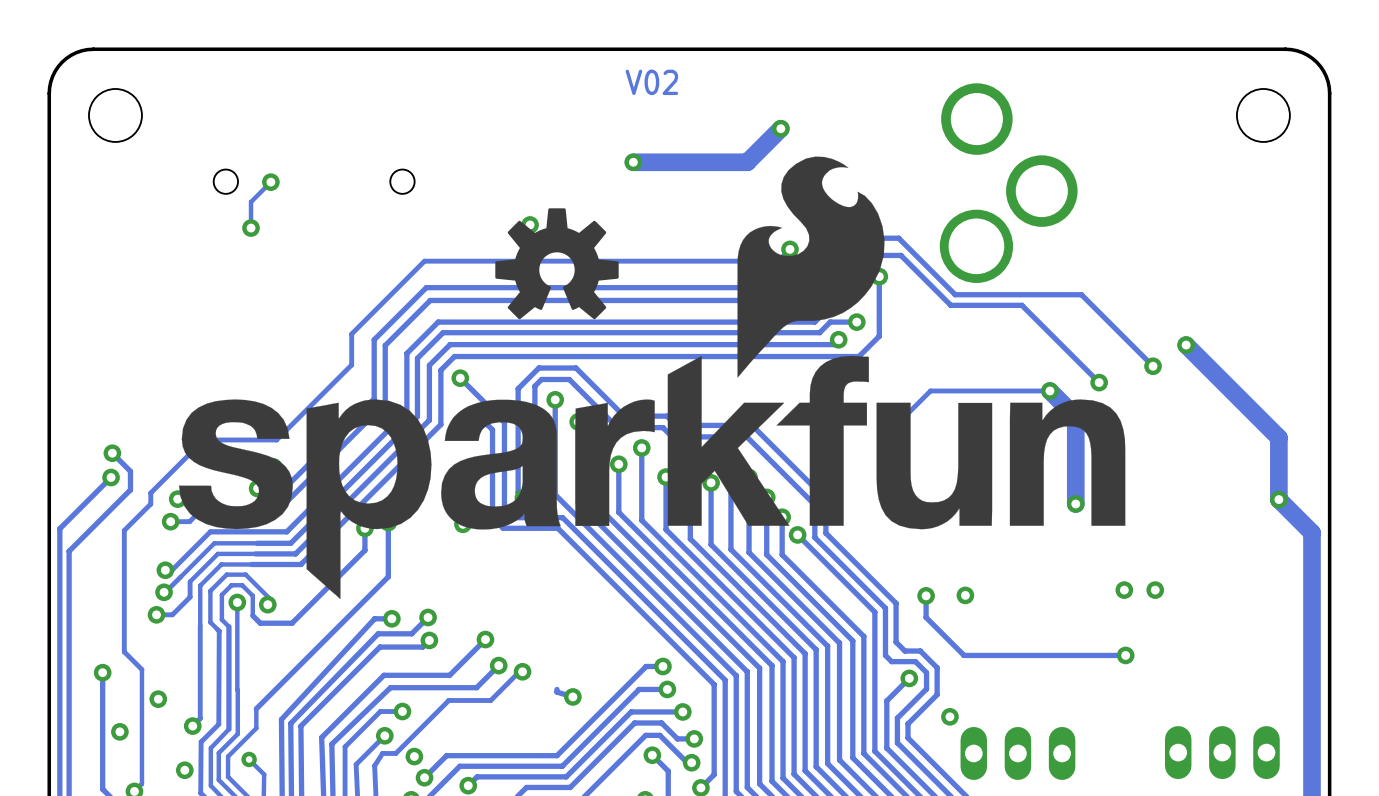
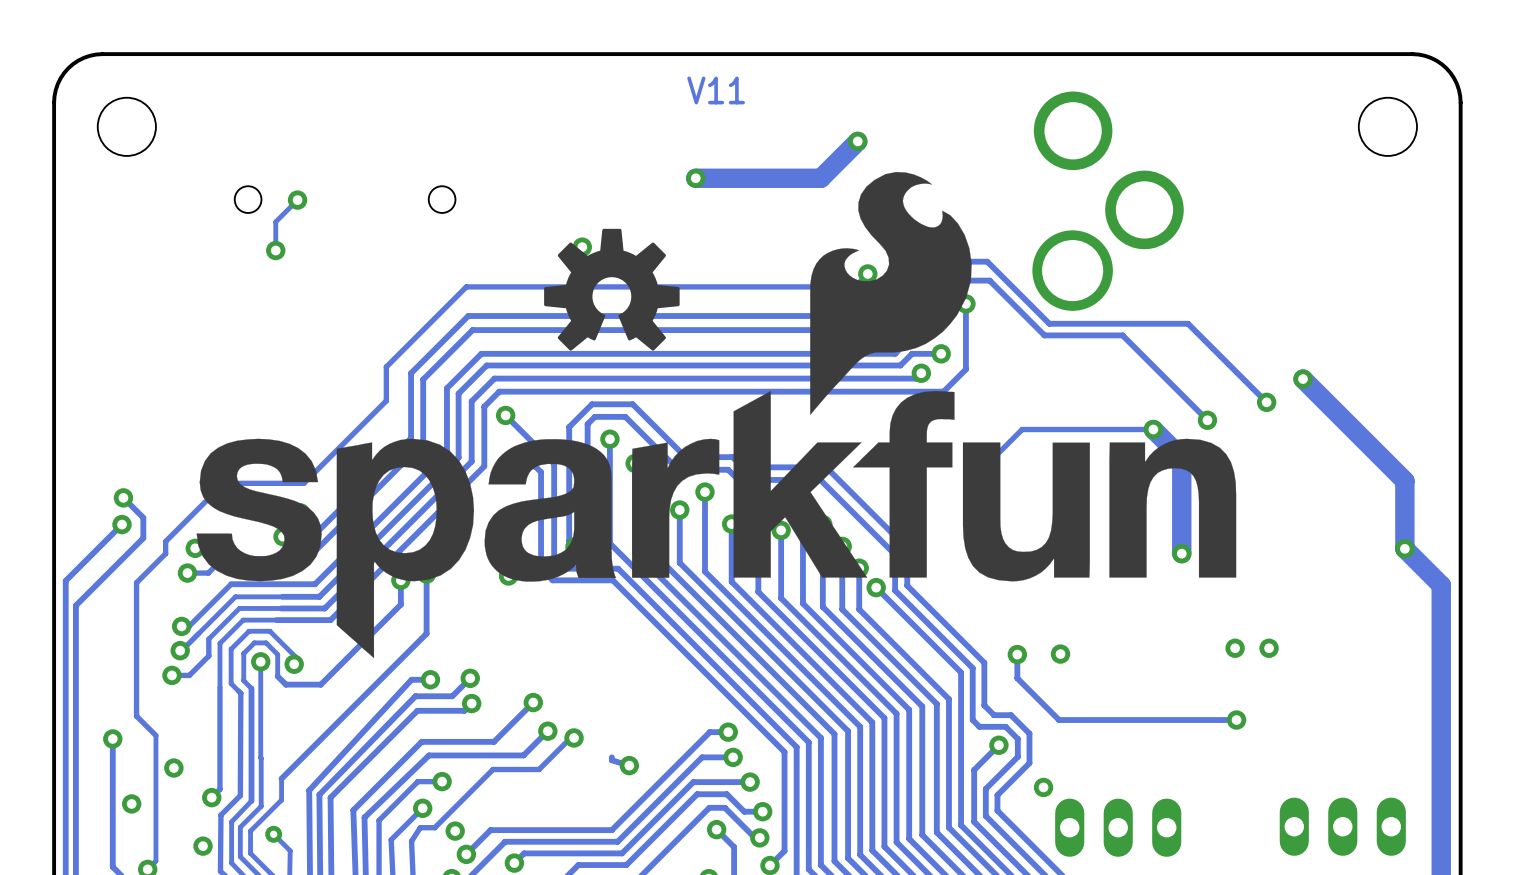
text: V02 (651, 82) -> V11 (716, 90)

